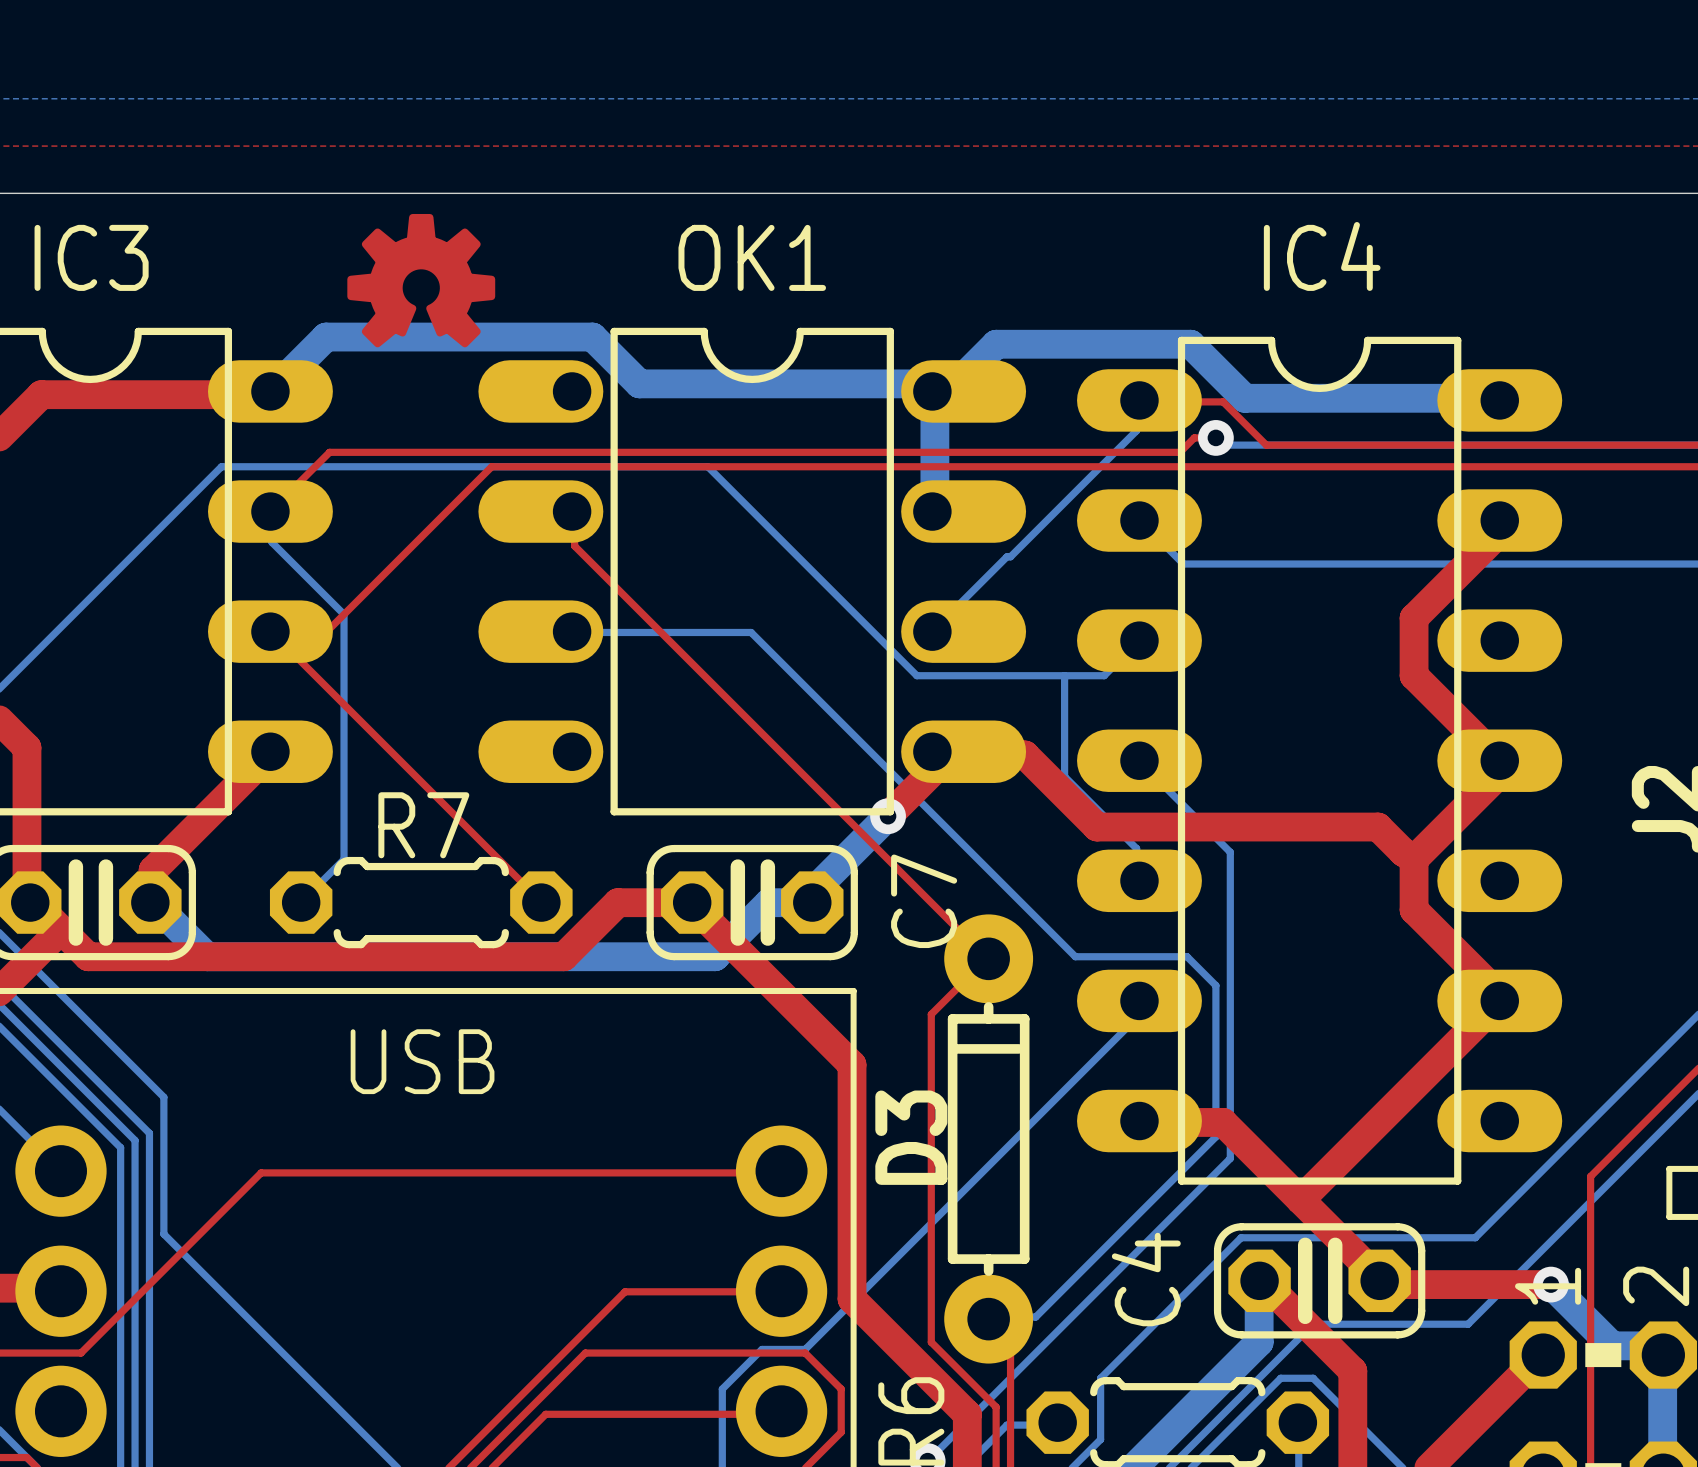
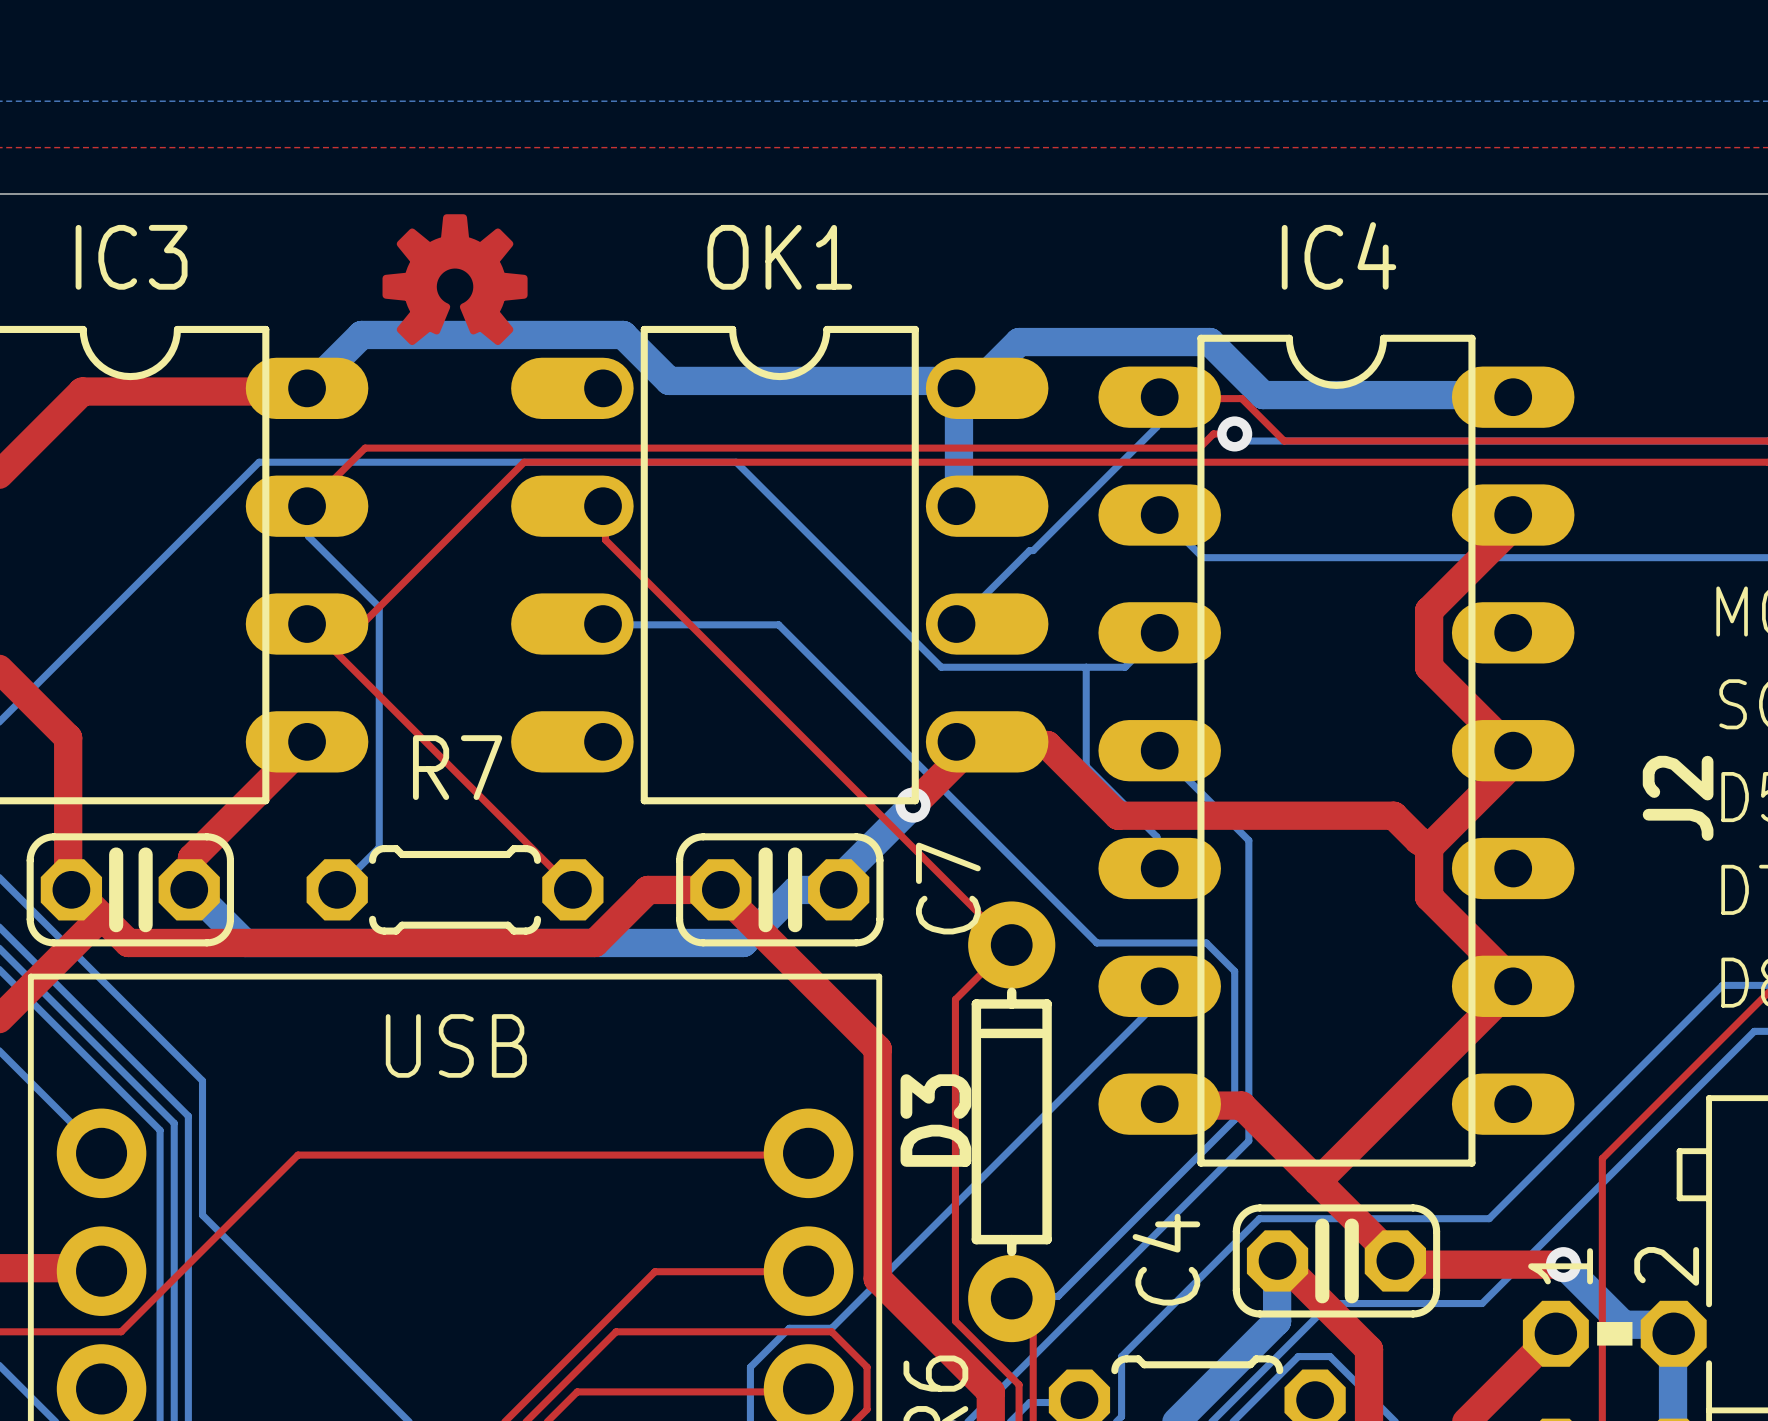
R7 name position: R7 (423, 825) -> R7 (457, 767)

